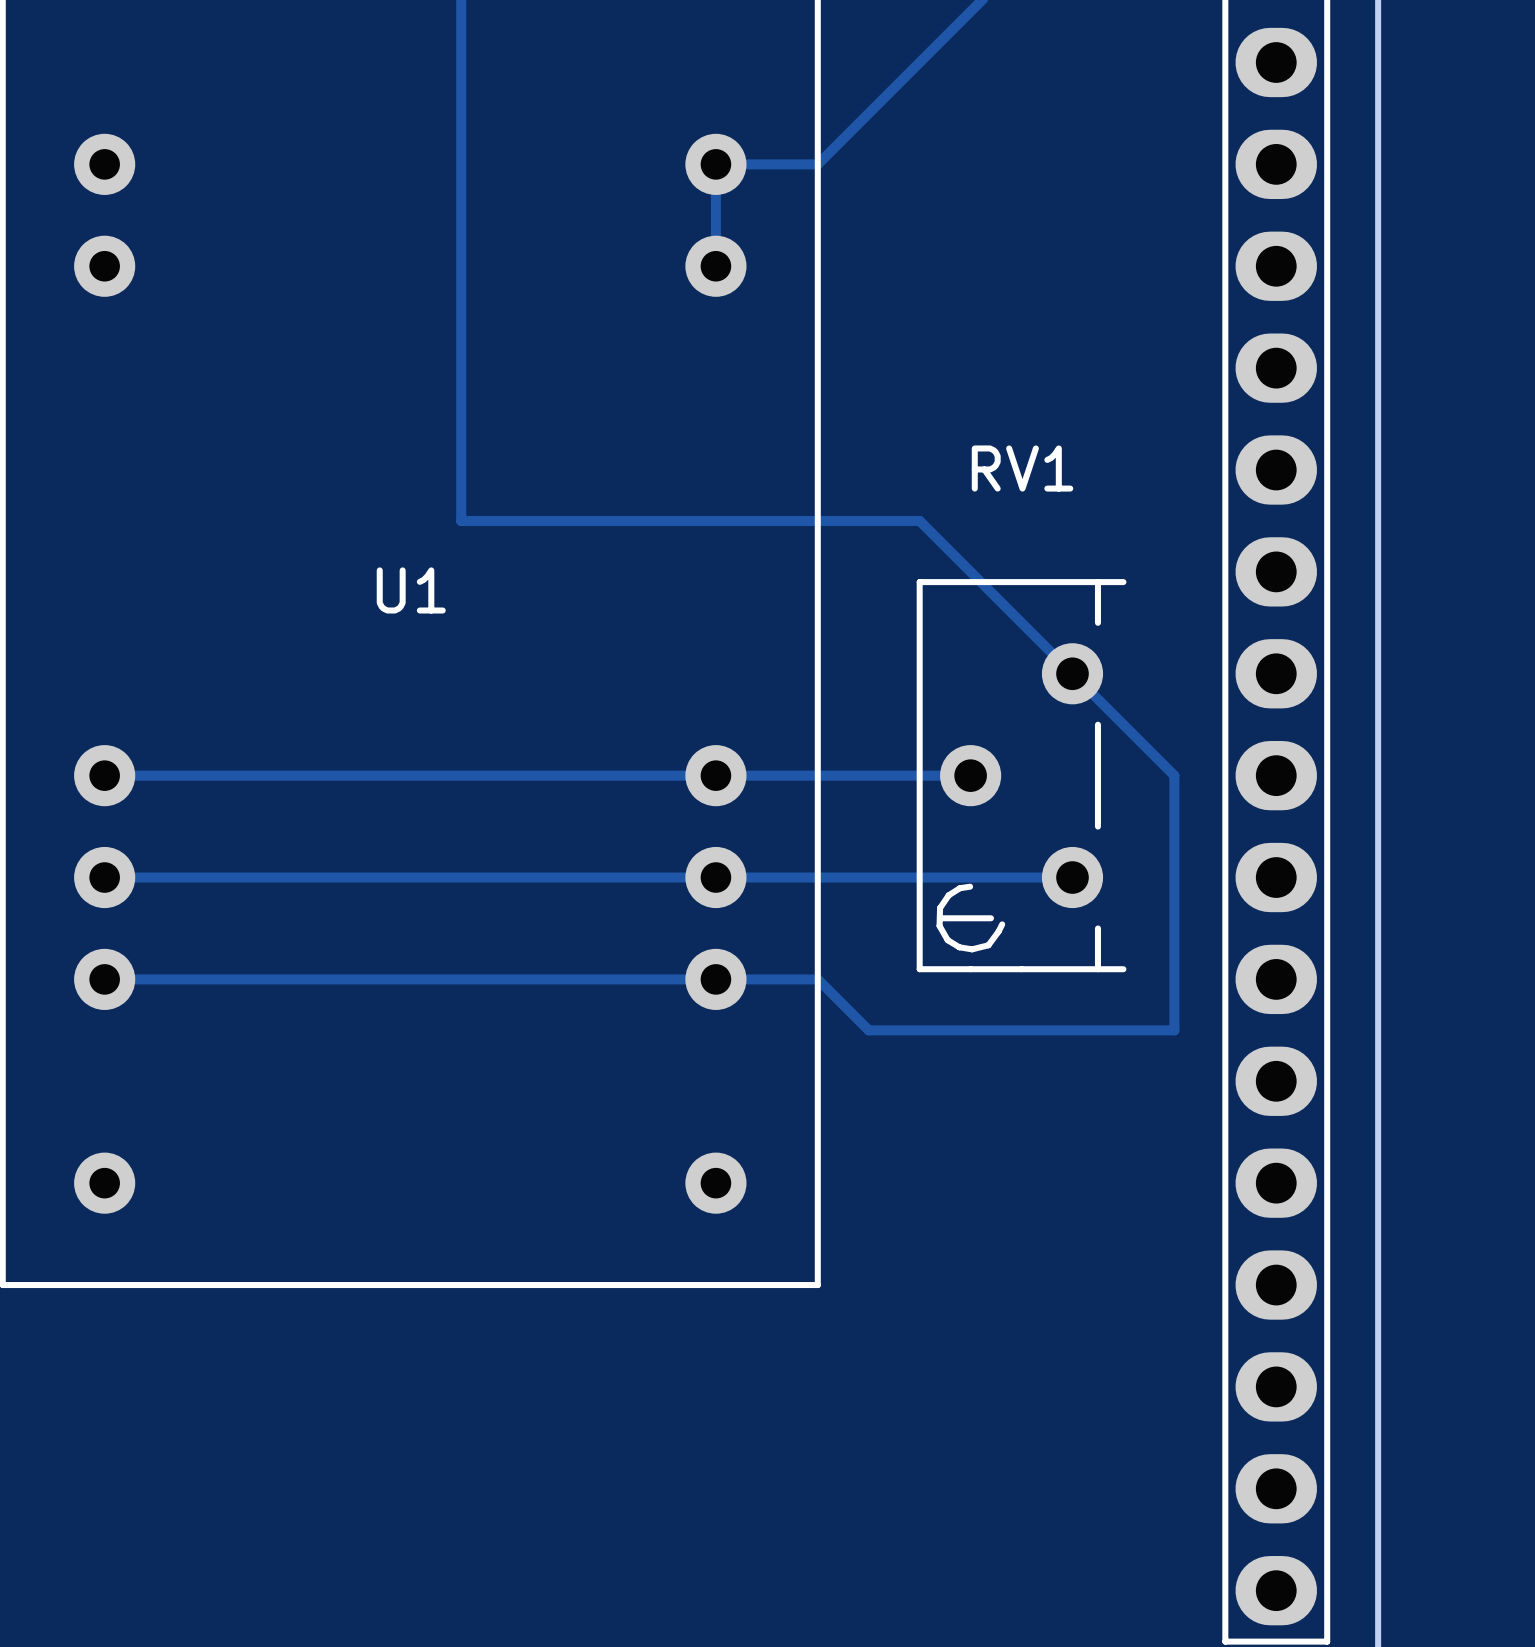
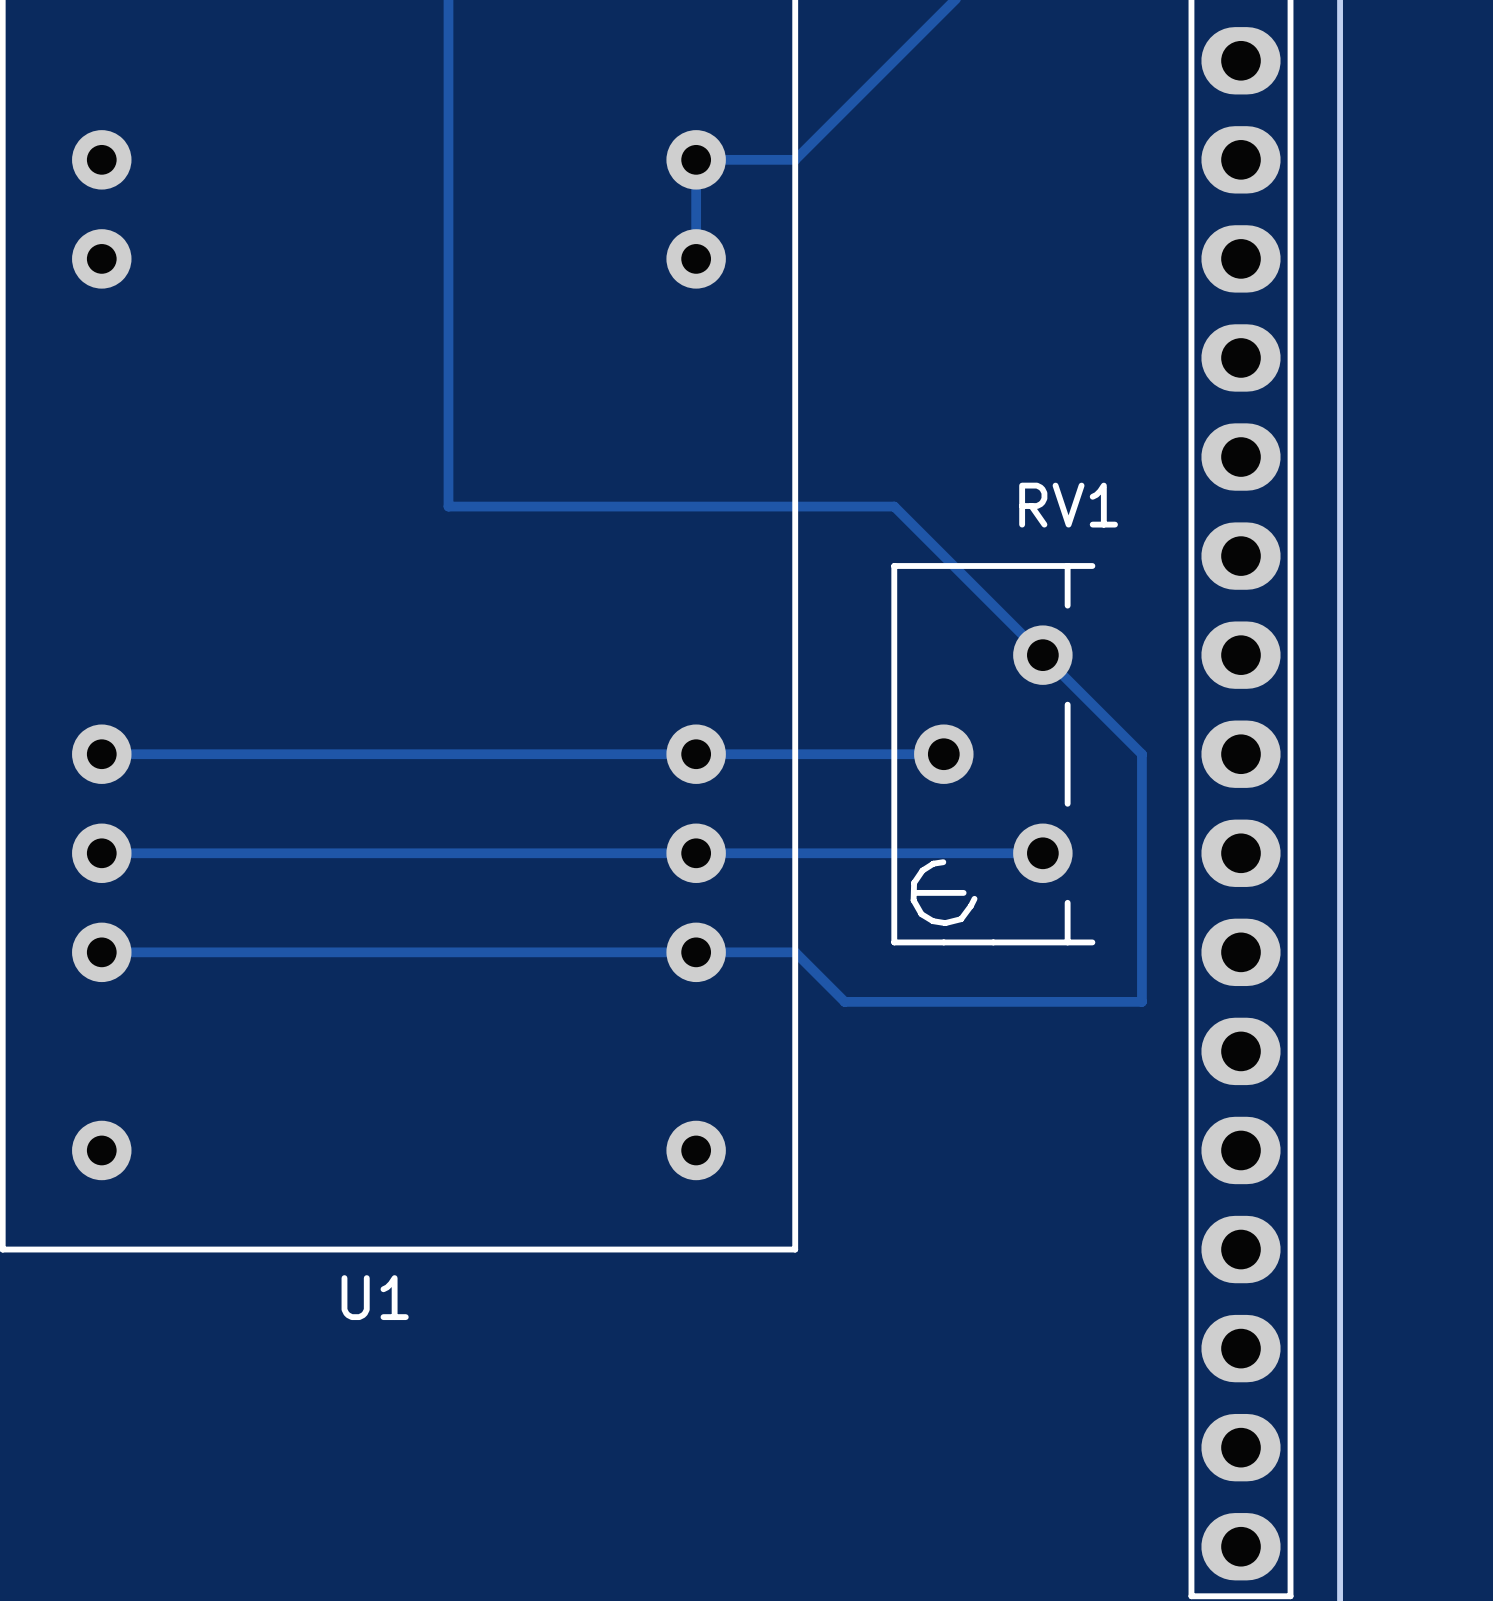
RV1 name position: RV1 (1022, 468) -> RV1 (1068, 505)
U1 name position: U1 (411, 590) -> U1 (375, 1297)

